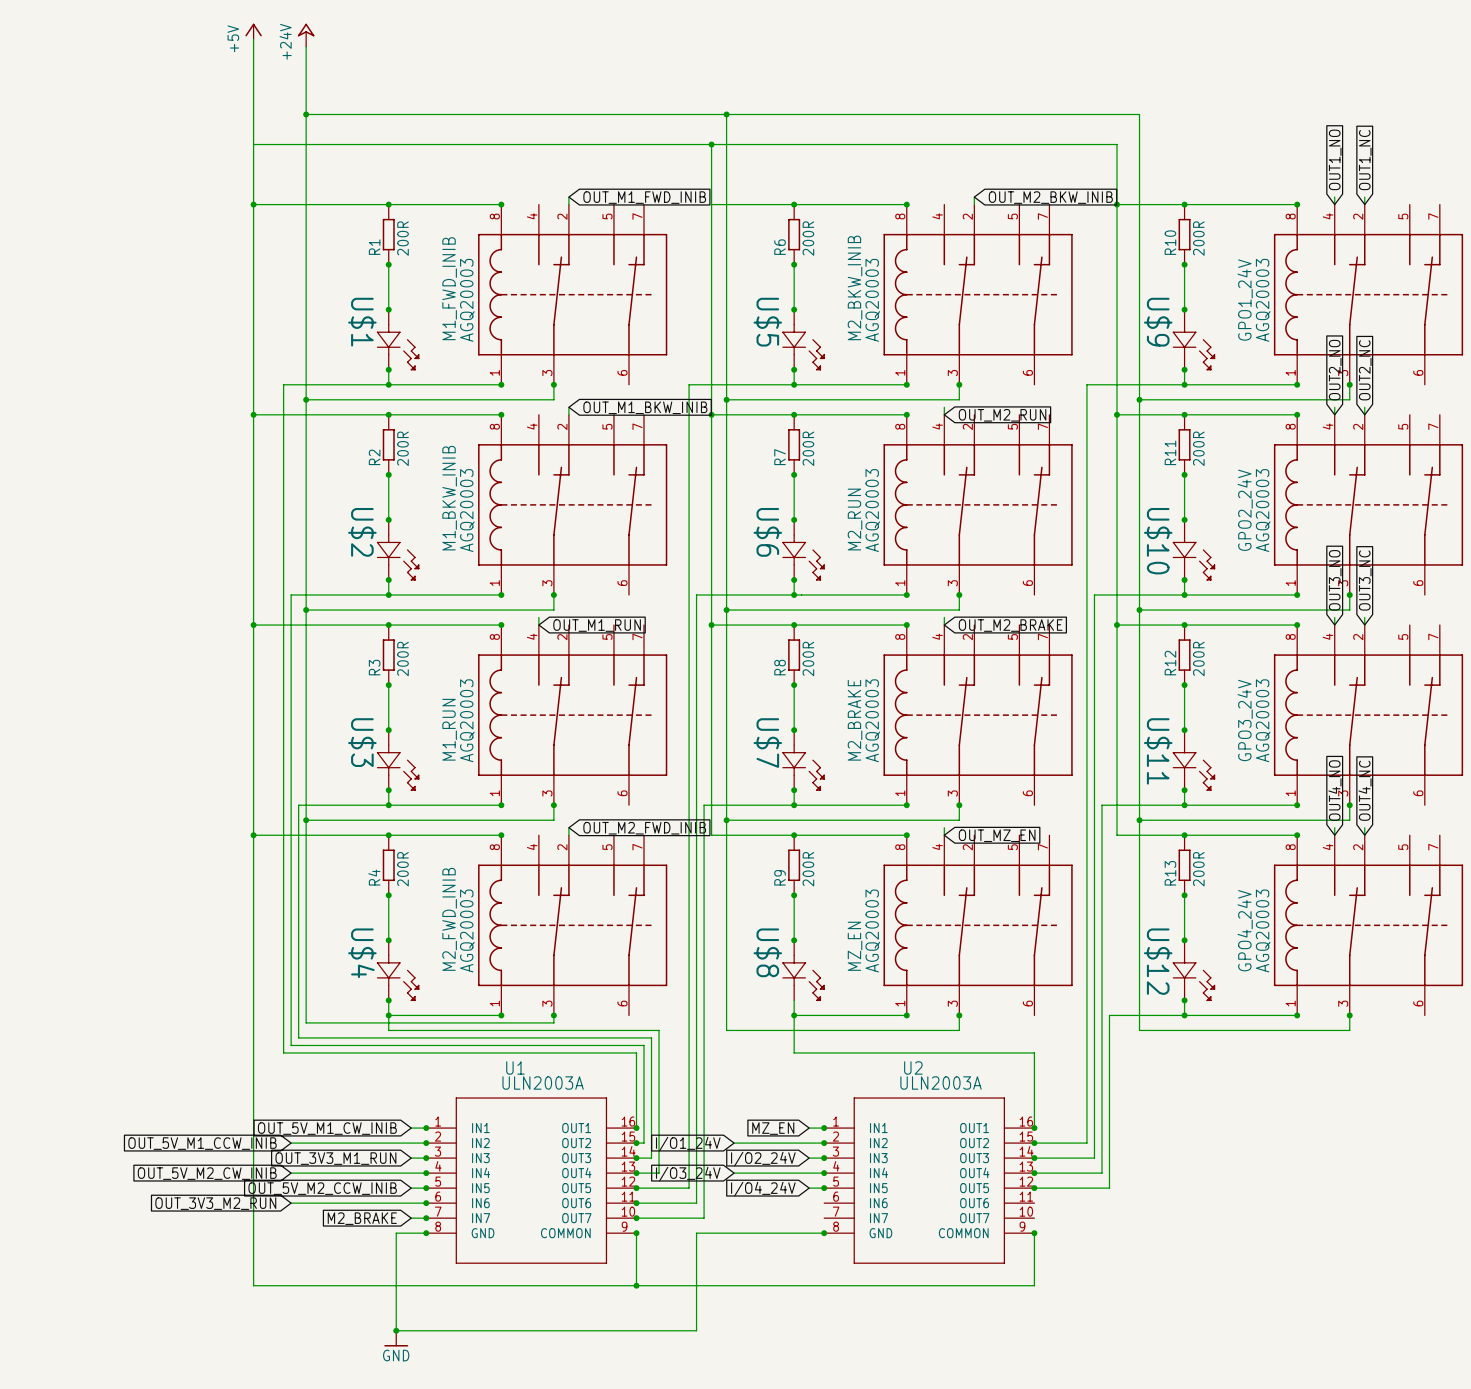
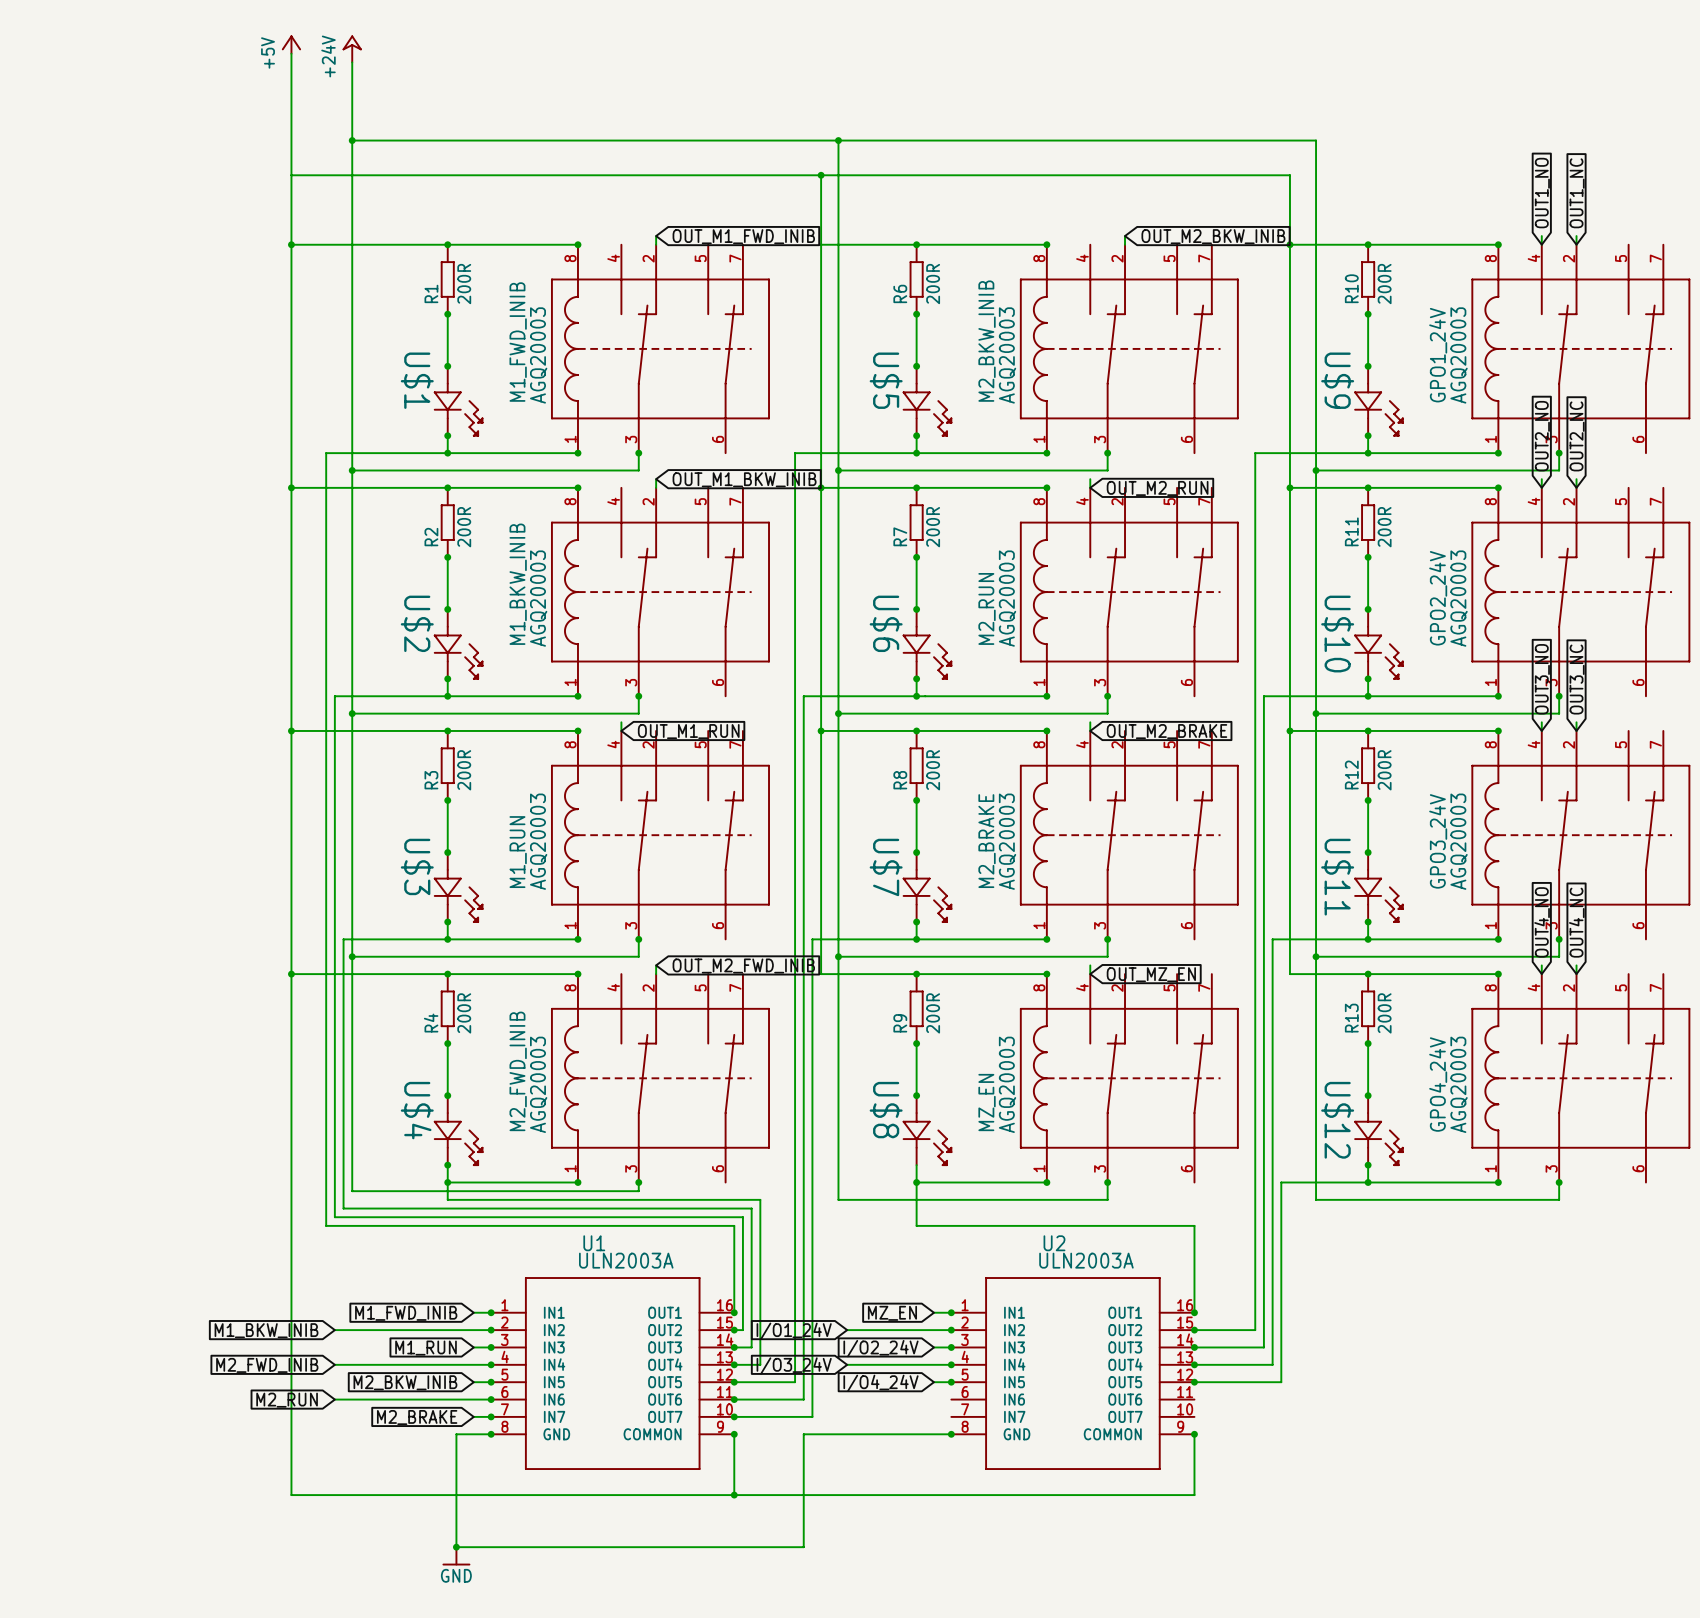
global label: OUT_5V_M1_CW_INIB (327, 1128) -> M1_FWD_INIB (406, 1313)
global label: OUT_5V_M1_CCW_INIB (202, 1143) -> M1_BKW_INIB (266, 1330)
global label: OUT_3V3_M1_RUN (335, 1158) -> M1_RUN (426, 1348)
global label: OUT_5V_M2_CW_INIB (207, 1173) -> M2_FWD_INIB (267, 1365)
global label: OUT_5V_M2_CCW_INIB (322, 1188) -> M2_BKW_INIB (405, 1382)
global label: OUT_3V3_M2_RUN (215, 1203) -> M2_RUN (287, 1400)

